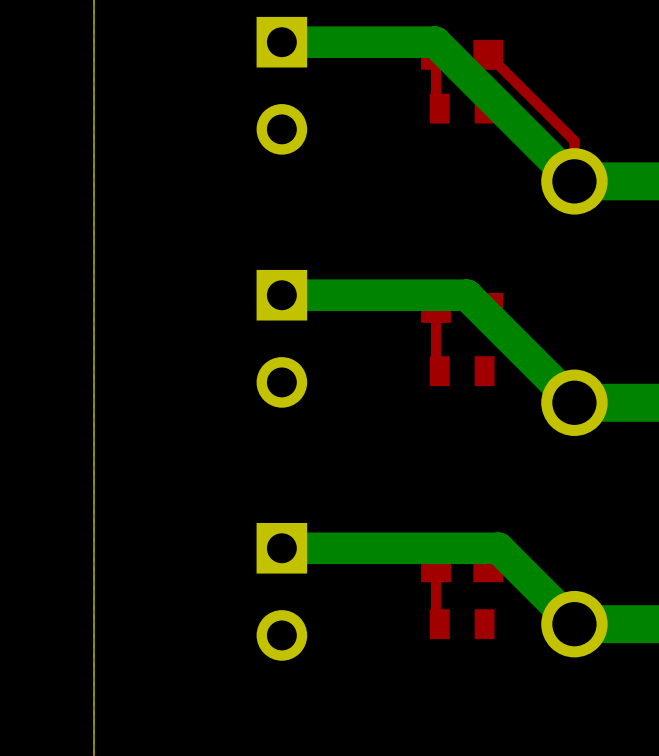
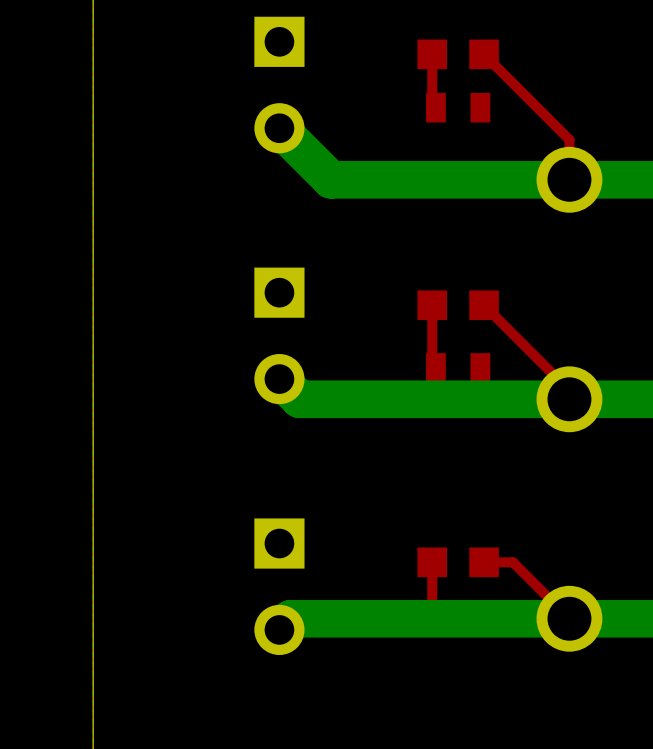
bottom track: (281, 42) (435, 42) (574, 181) -> (279, 128) (330, 179) (569, 179)
bottom track: (281, 295) (466, 295) (574, 402) -> (279, 379) (299, 399) (569, 399)
bottom track: (281, 548) (498, 548) (574, 624) -> (279, 629) (290, 618) (569, 618)

